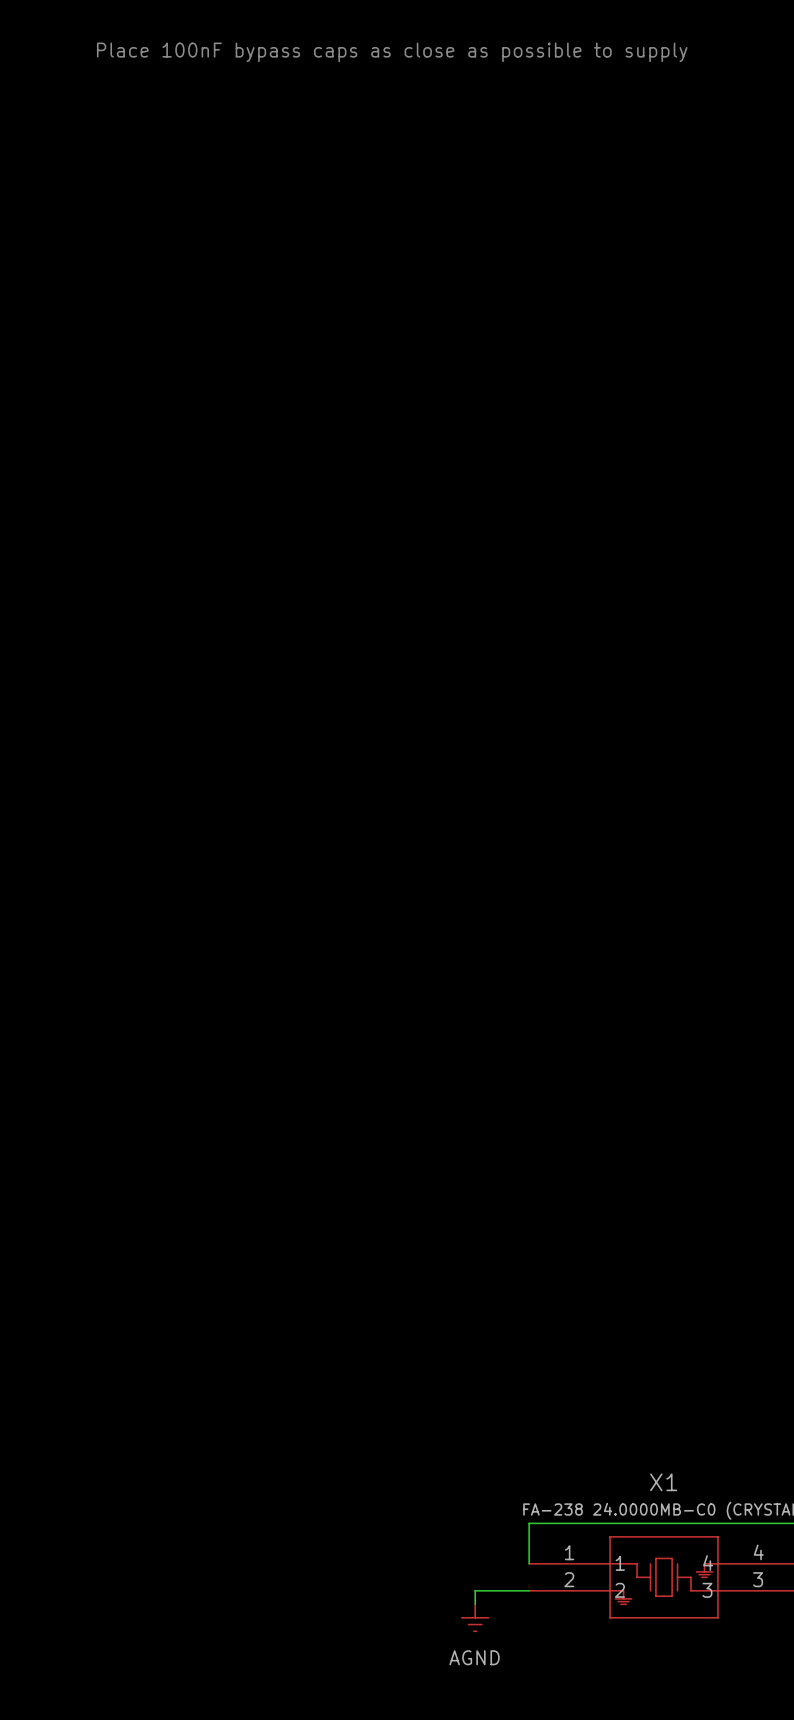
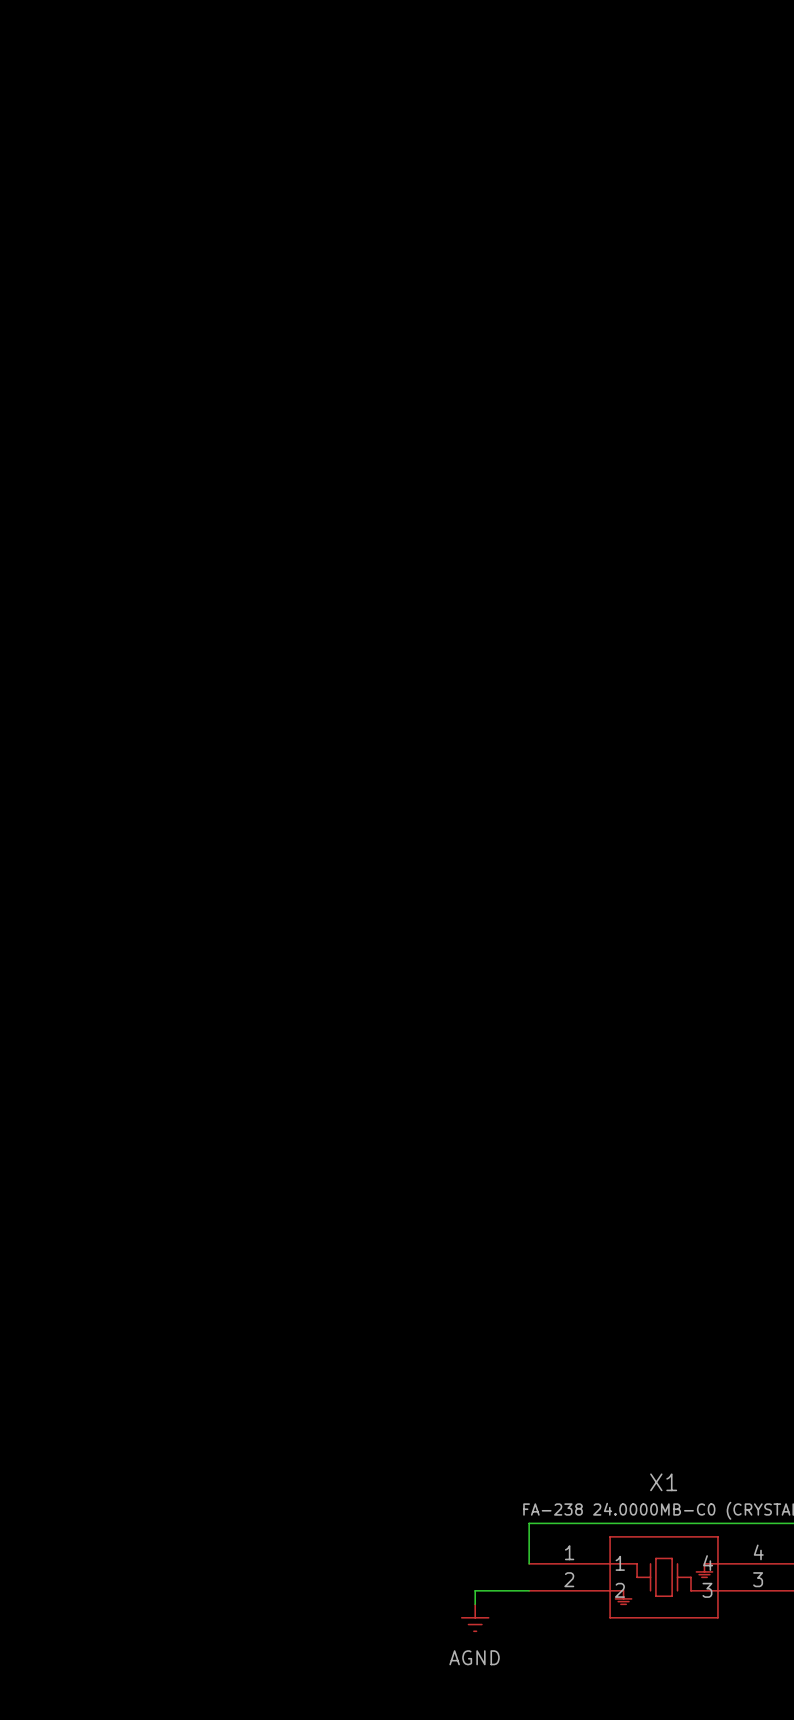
text: Place 100nF bypass caps as close as possible to supply (392, 52) -> none

